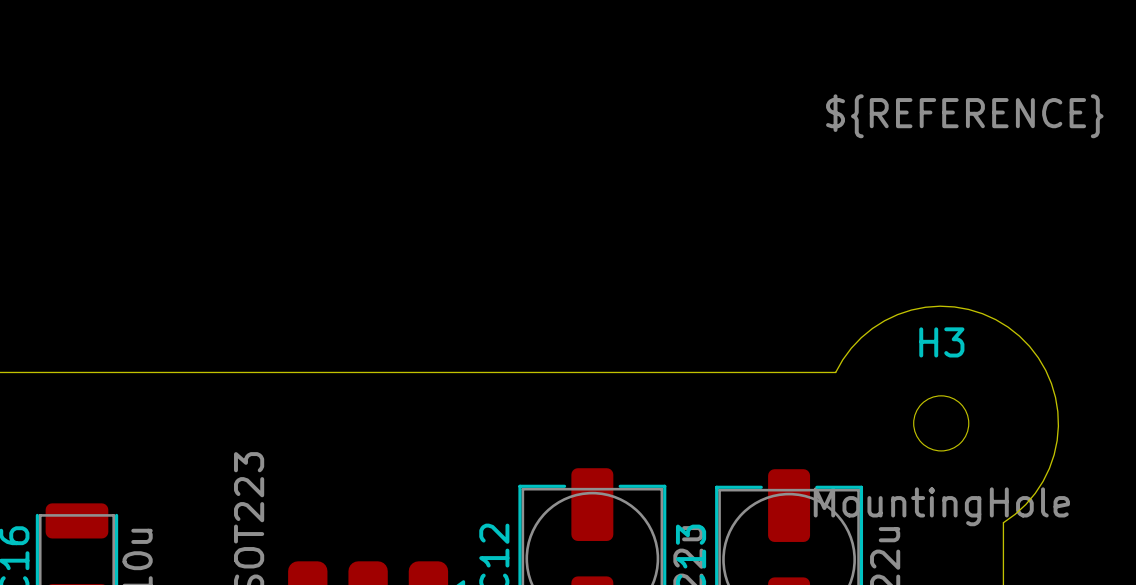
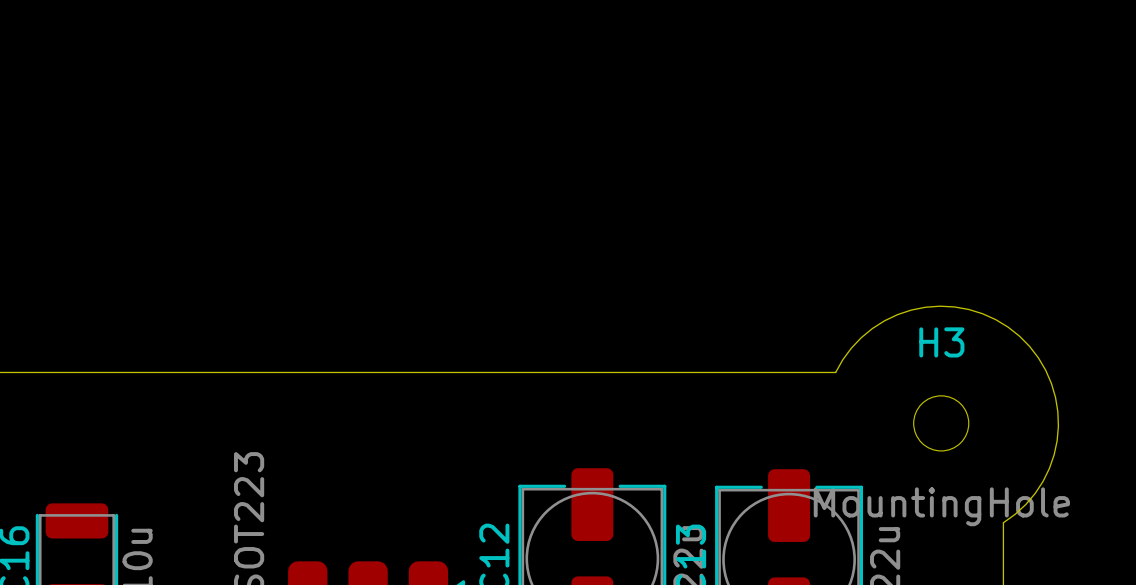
text: ${REFERENCE} (964, 116) -> none

